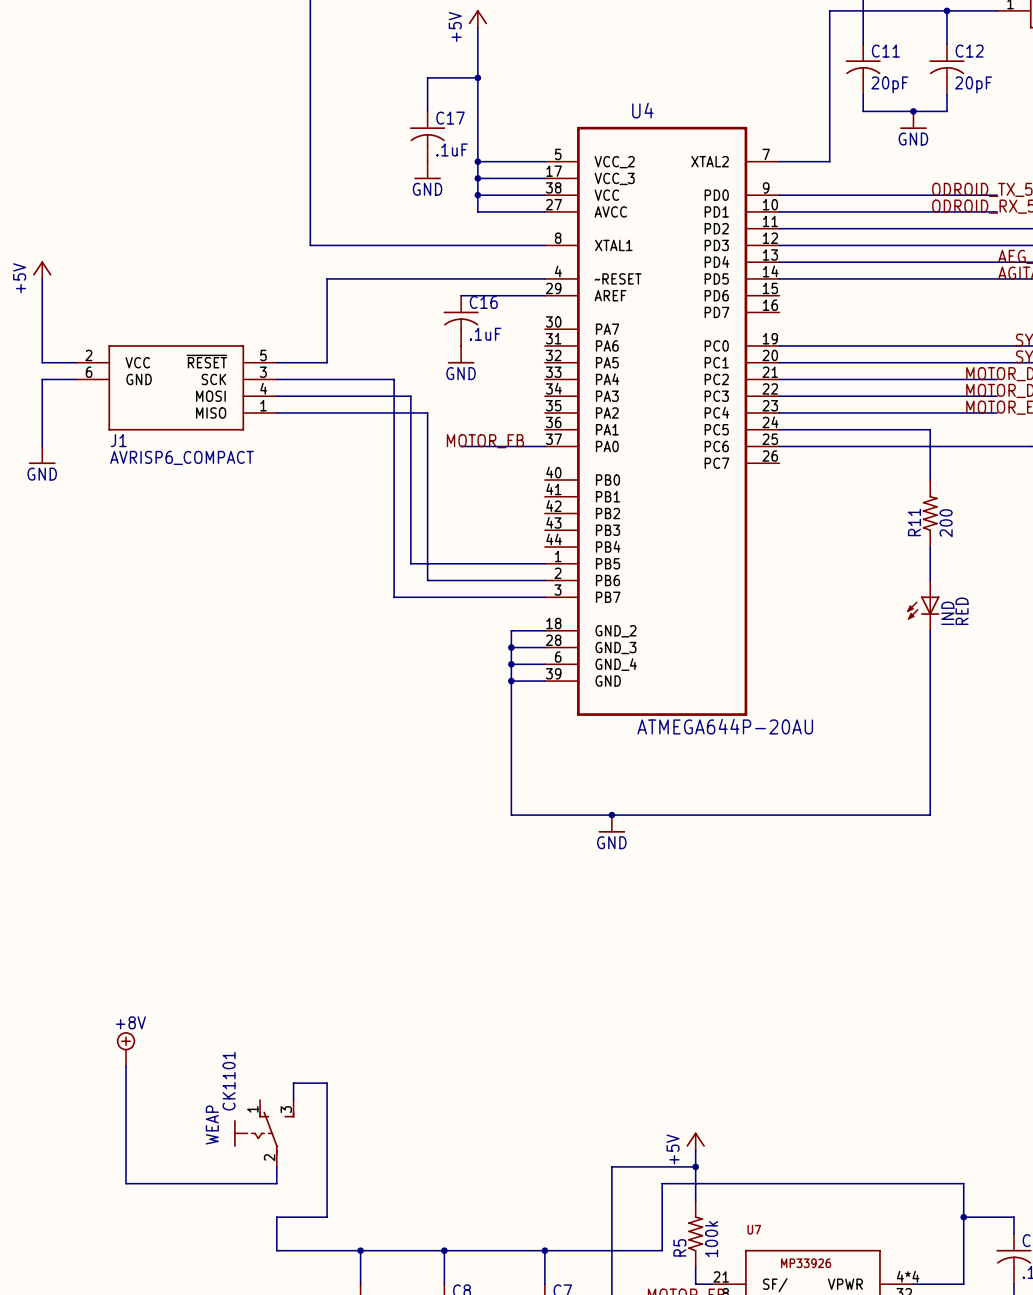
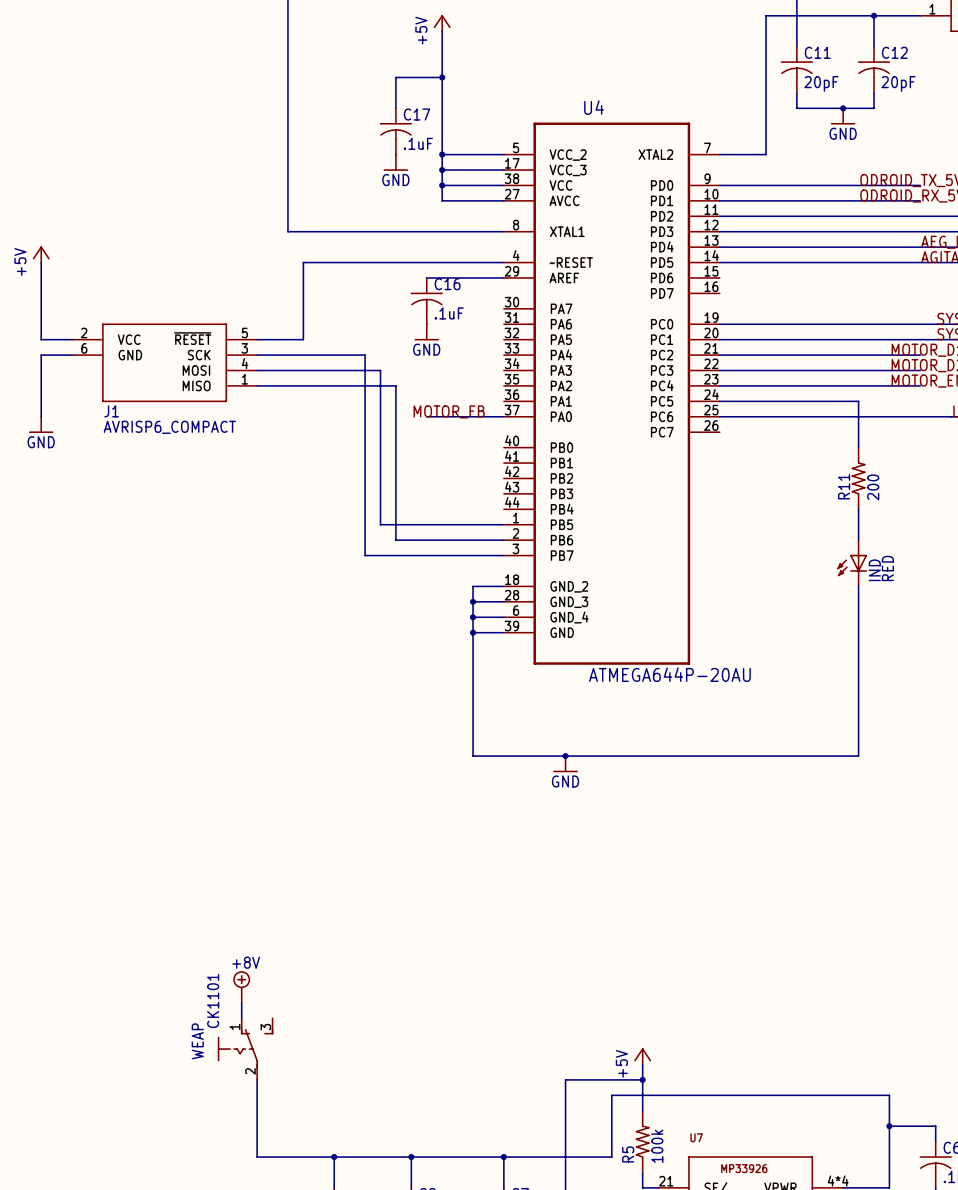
power symbol position: +8V (126, 1049) -> +8V (241, 987)
wire: (126, 1066) (126, 1183) (276, 1183) -> none
wire: none -> (241, 1002) (241, 1018)
wire: (293, 1099) (293, 1083) (327, 1083) (327, 1217) (276, 1217) -> (257, 1095) (257, 1126)

